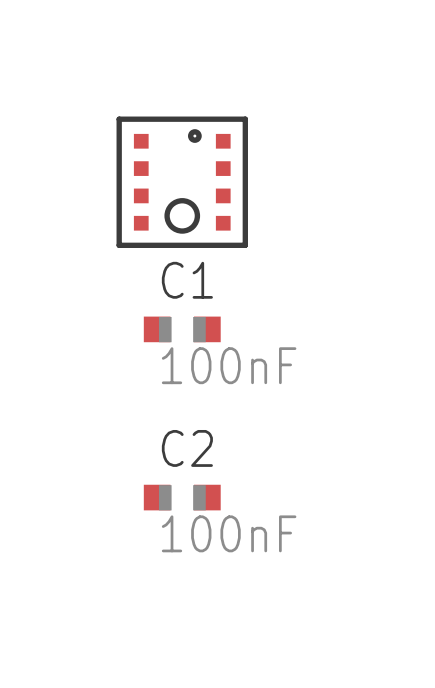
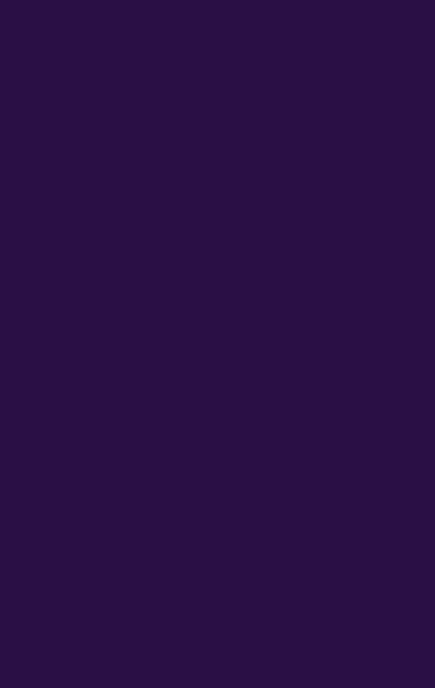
part: (182, 182) -> none
C1: 100nF (182, 329) -> none
C2: 100nF (182, 497) -> none

